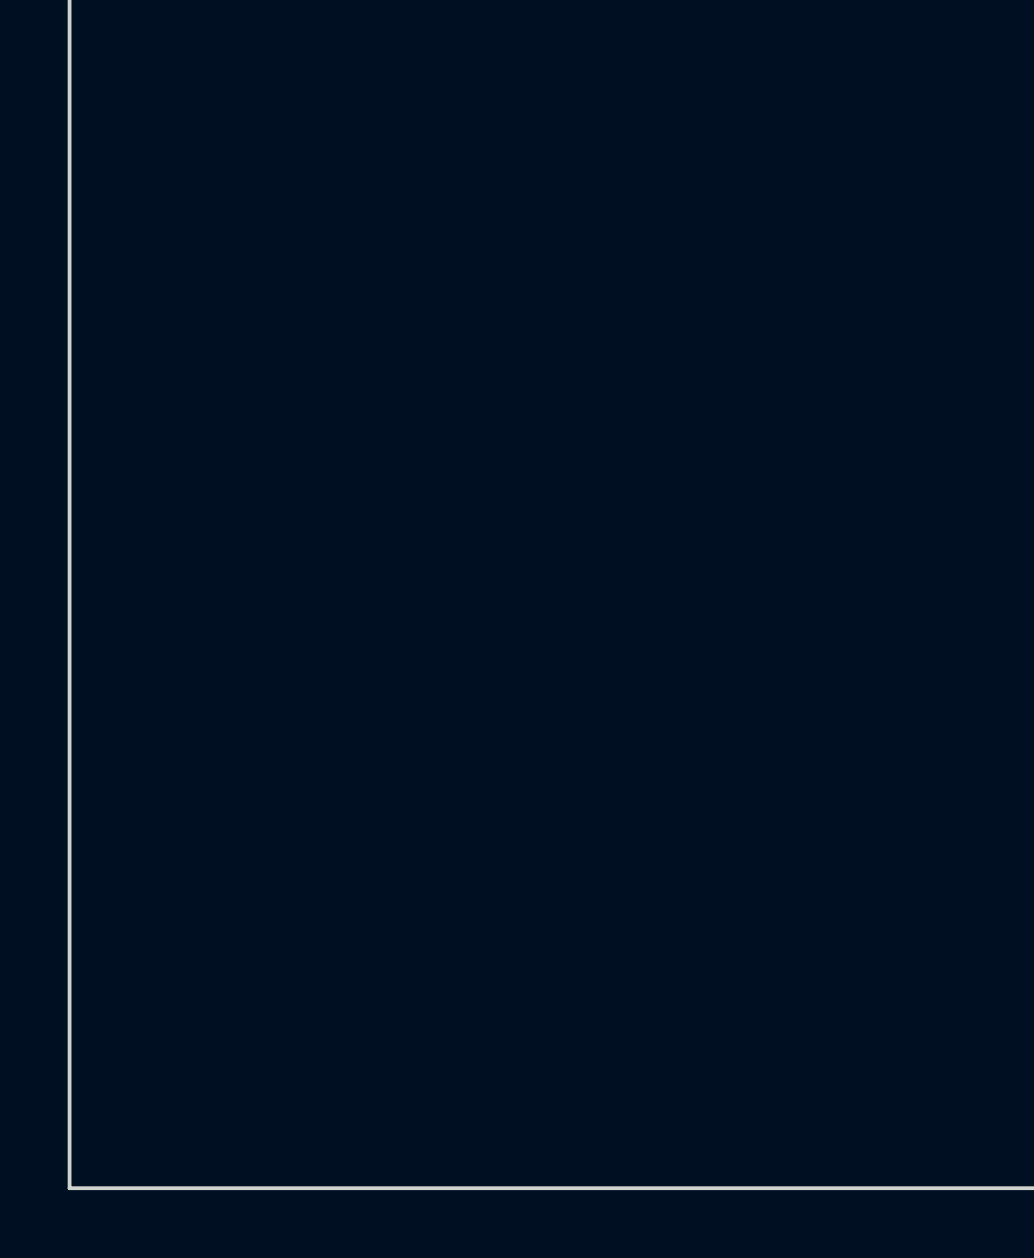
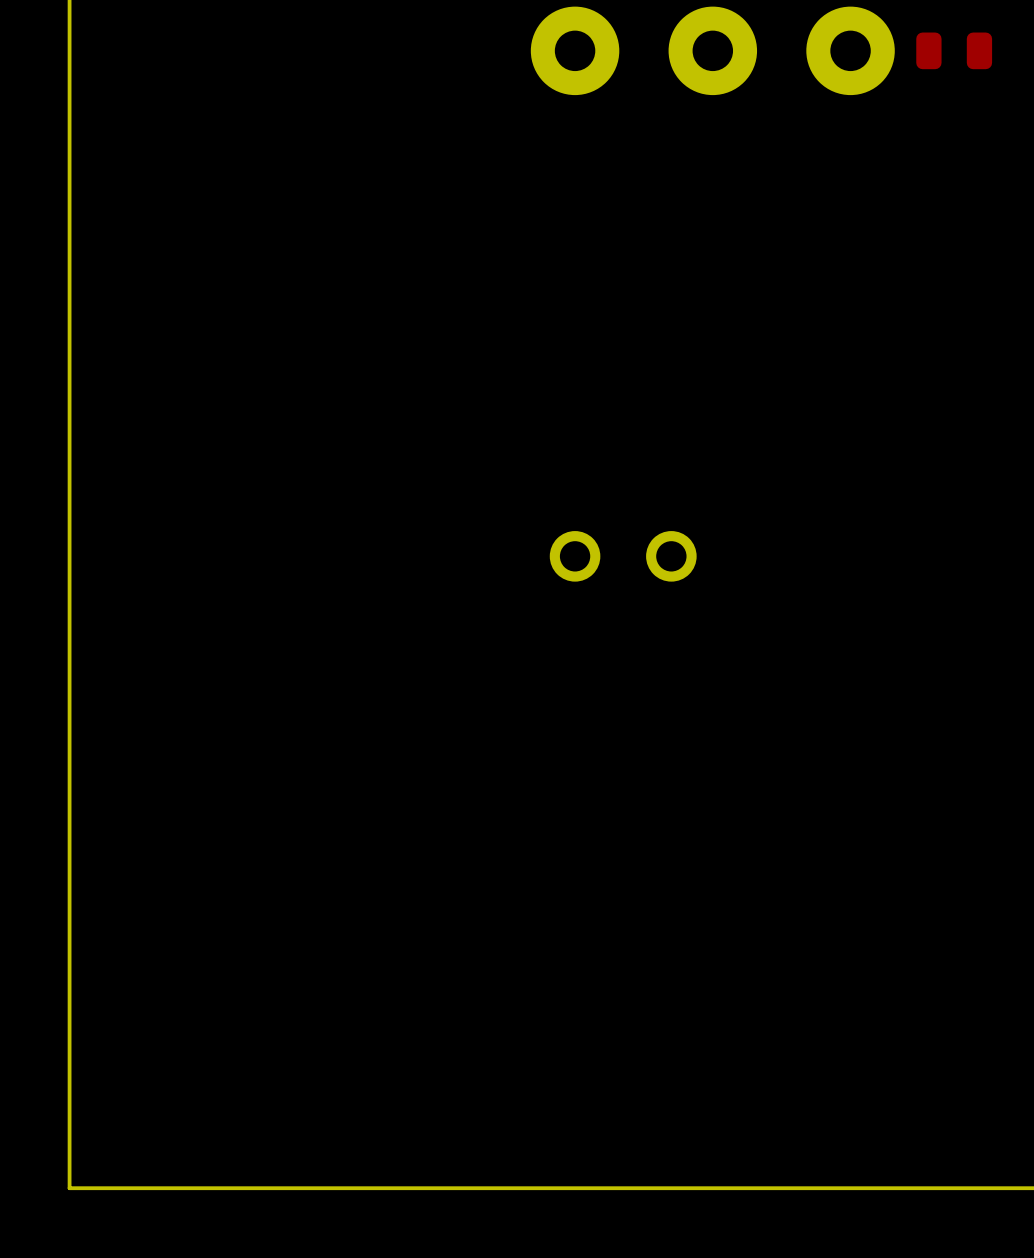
part: none -> (712, 50)
part: none -> (954, 50)
part: none -> (623, 556)

